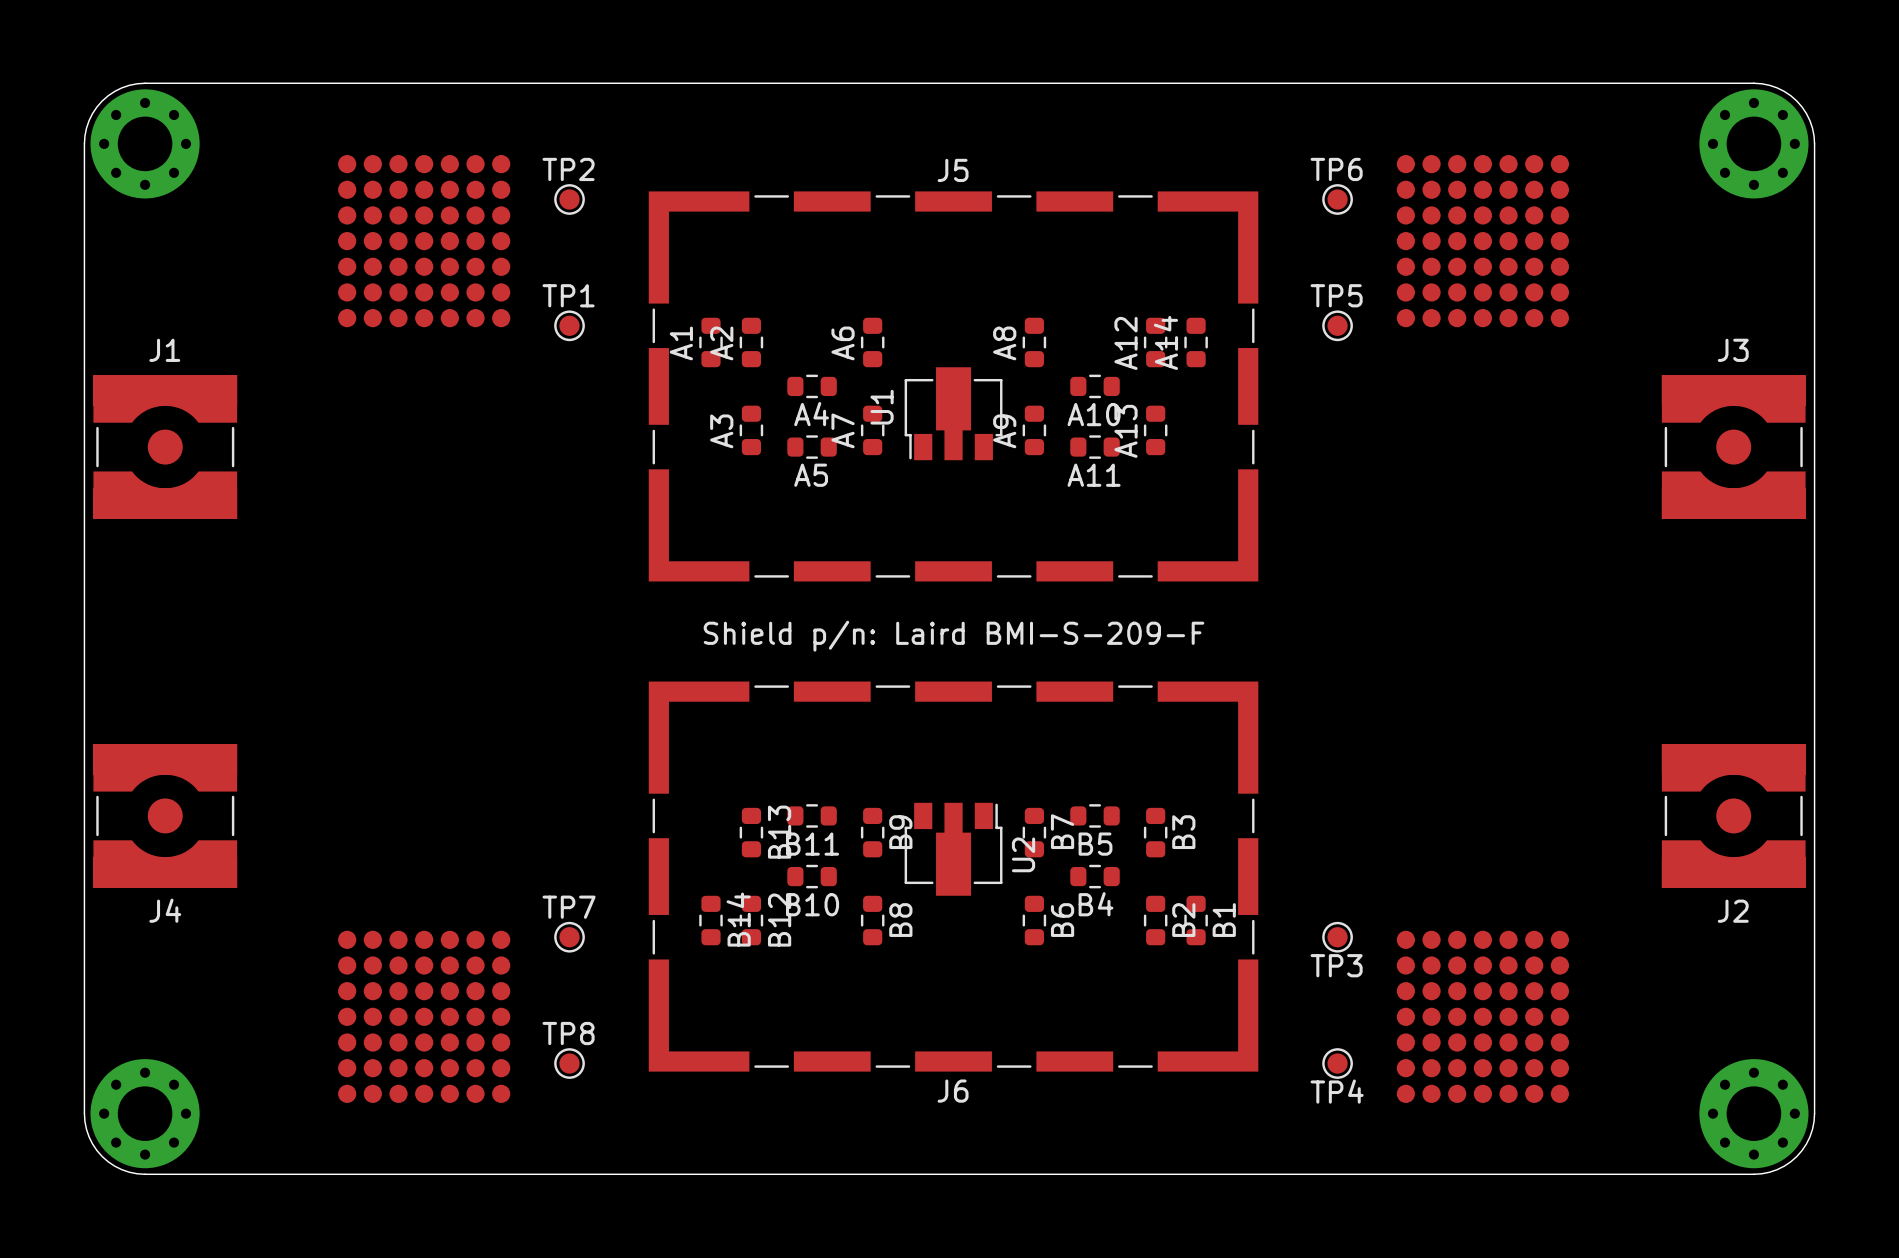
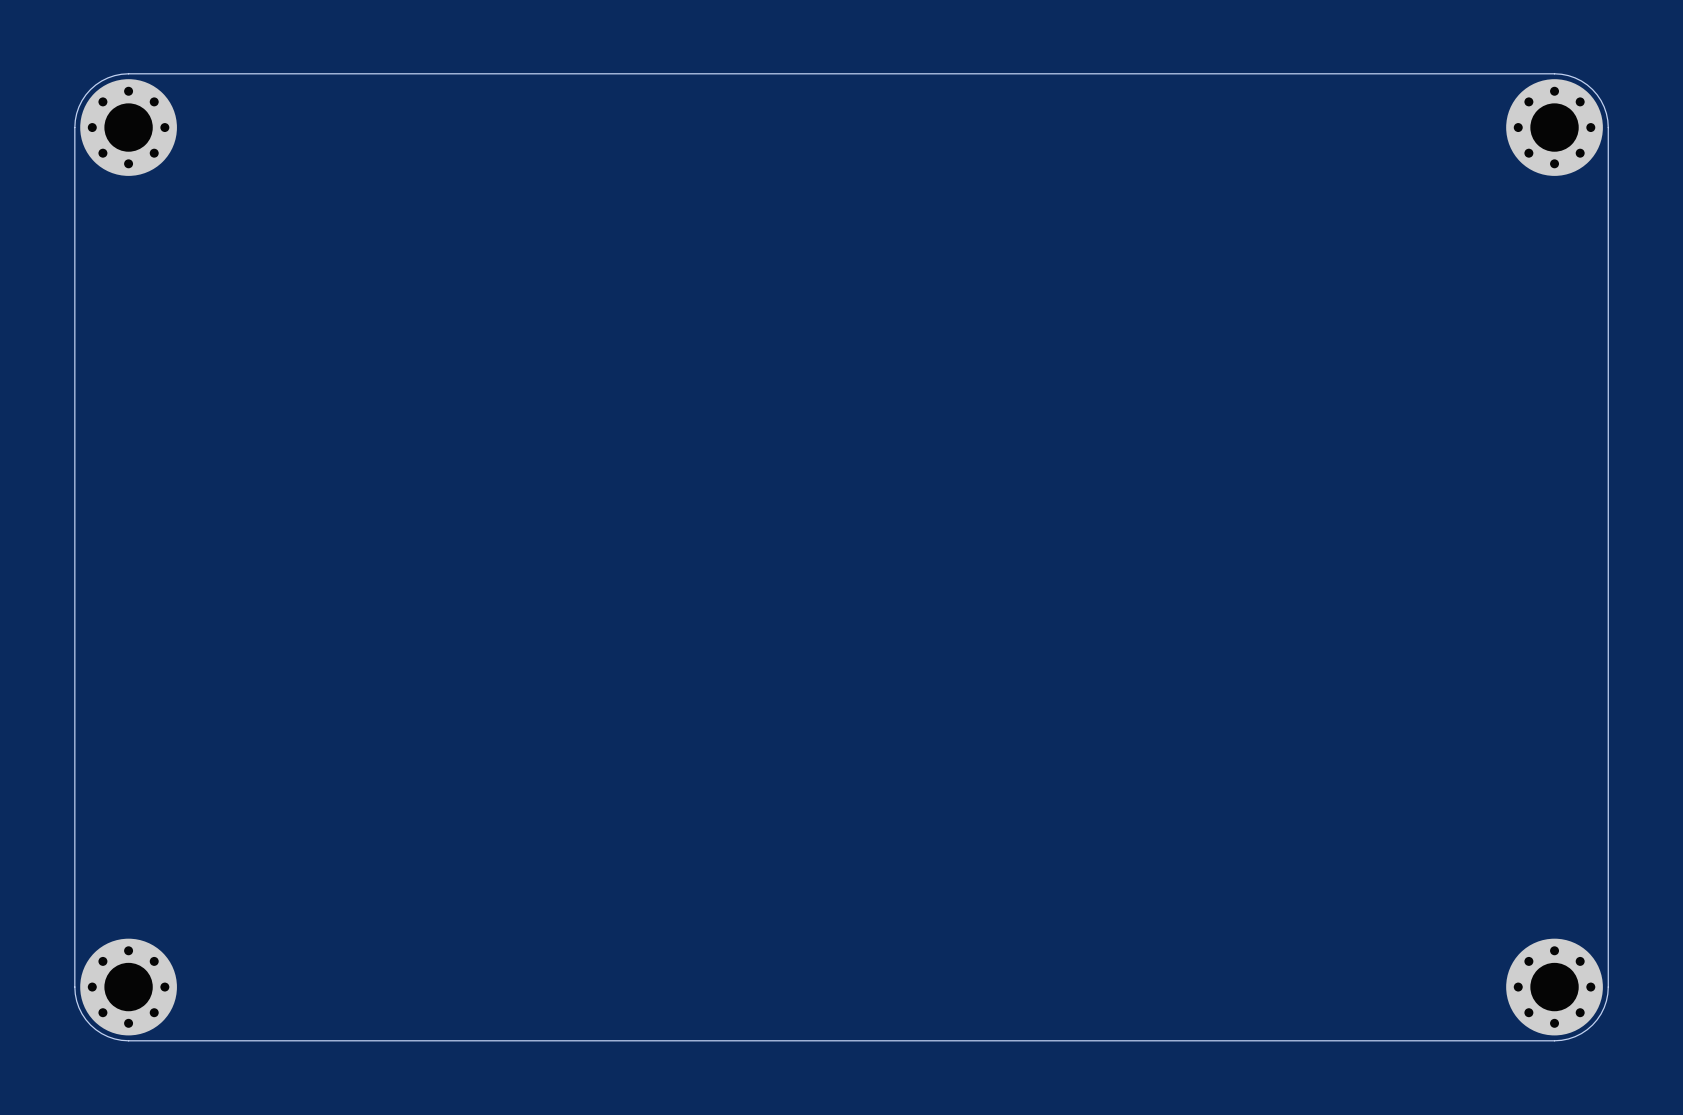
TP2: (569, 199) -> none
TP6: (1337, 199) -> none
part: (424, 241) -> none
part: (1482, 241) -> none
TP1: (569, 325) -> none
TP5: (1337, 325) -> none
A1: (711, 342) -> none
A2: (751, 342) -> none
A6: (872, 342) -> none
A8: (1034, 342) -> none
A12: (1155, 342) -> none
A14: (1196, 342) -> none
A4: (812, 386) -> none
J5: (953, 386) -> none
A10: (1095, 386) -> none
U1: (953, 413) -> none
A3: (751, 430) -> none
A7: (872, 430) -> none
A9: (1034, 430) -> none
A13: (1155, 430) -> none
J1: (165, 447) -> none
A5: (812, 447) -> none
A11: (1095, 447) -> none
J3: (1733, 447) -> none
text: Shield p/n: Laird BMI-S-209-F (954, 636) -> none
J4: (165, 815) -> none
B11: (812, 815) -> none
B5: (1095, 815) -> none
J2: (1733, 815) -> none
B13: (751, 832) -> none
B9: (872, 832) -> none
B7: (1034, 832) -> none
B3: (1155, 832) -> none
U2: (953, 849) -> none
B10: (812, 876) -> none
J6: (953, 876) -> none
B4: (1095, 876) -> none
B14: (711, 920) -> none
B12: (751, 920) -> none
B8: (872, 920) -> none
B6: (1034, 920) -> none
B2: (1155, 920) -> none
B1: (1196, 920) -> none
TP7: (569, 937) -> none
TP3: (1337, 937) -> none
part: (424, 1016) -> none
part: (1482, 1016) -> none
TP8: (569, 1063) -> none
TP4: (1337, 1063) -> none

